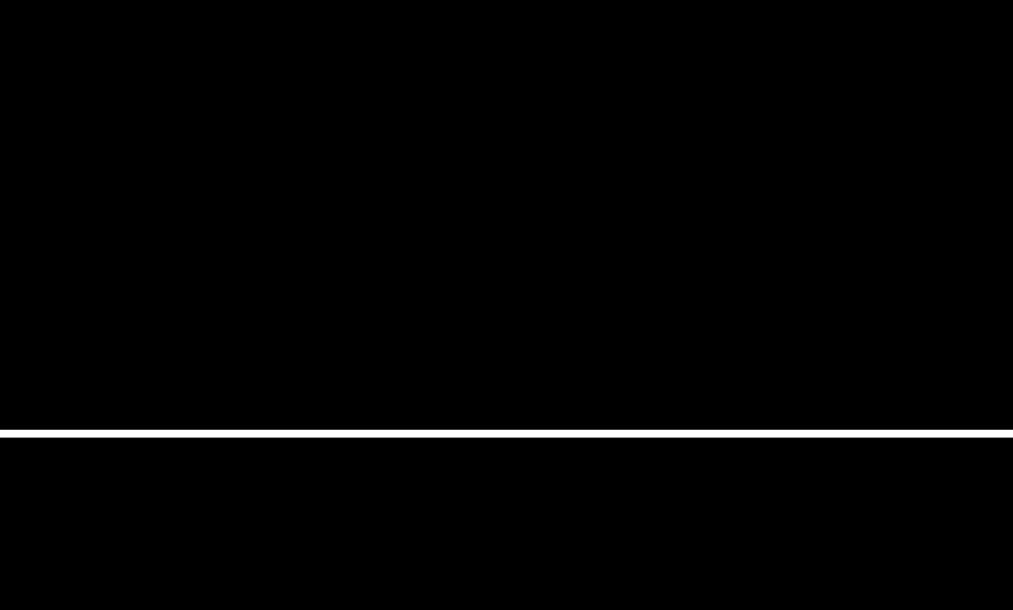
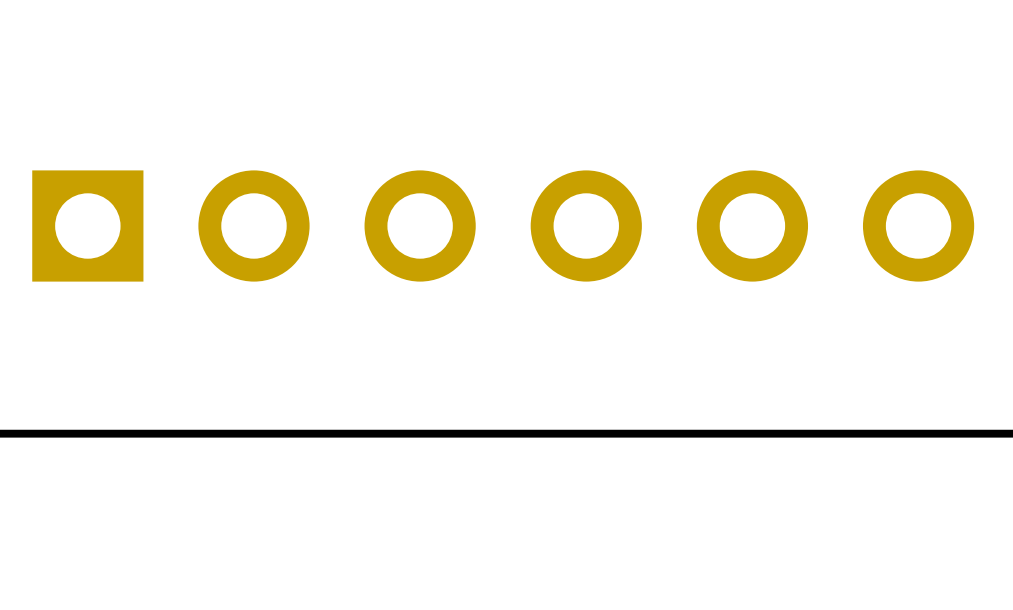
part: none -> (503, 226)

